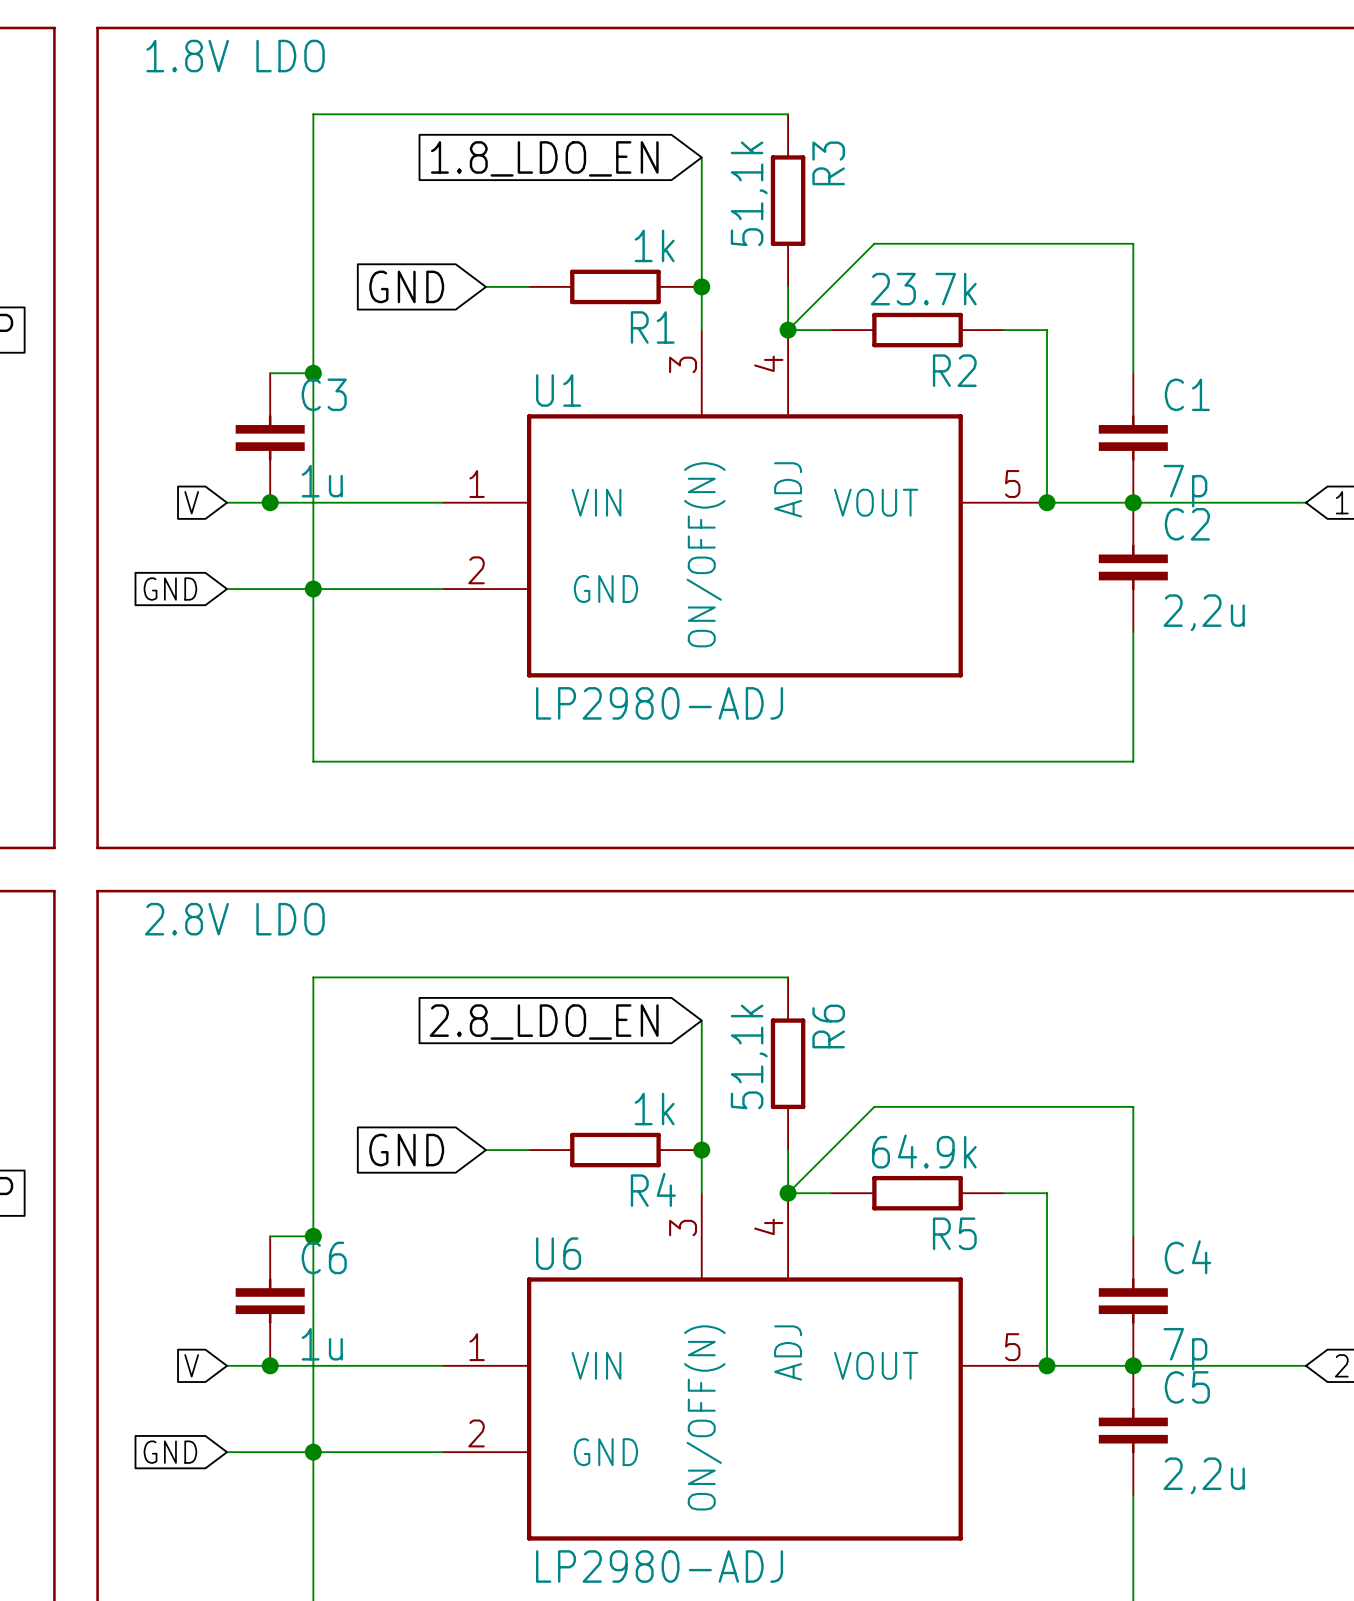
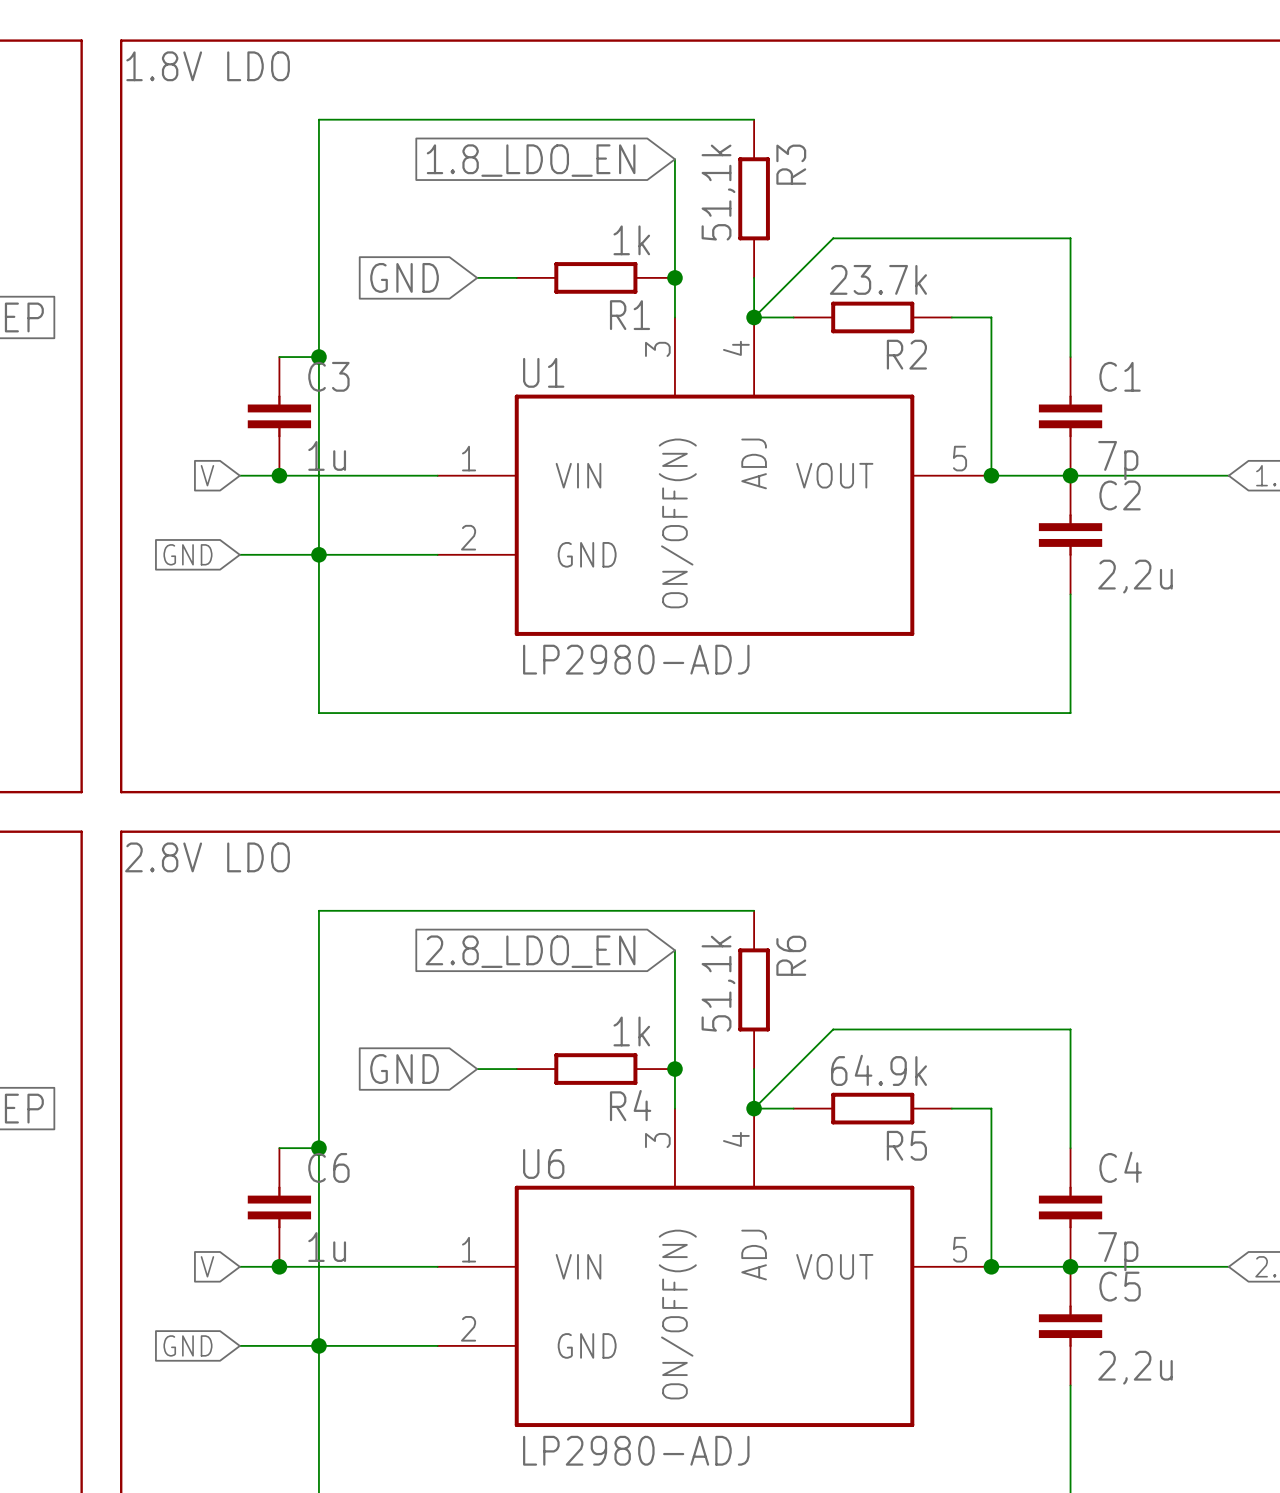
text position: 1.8V LDO (235, 56) -> 1.8V LDO (208, 66)
text position: 2.8V LDO (234, 919) -> 2.8V LDO (207, 857)

